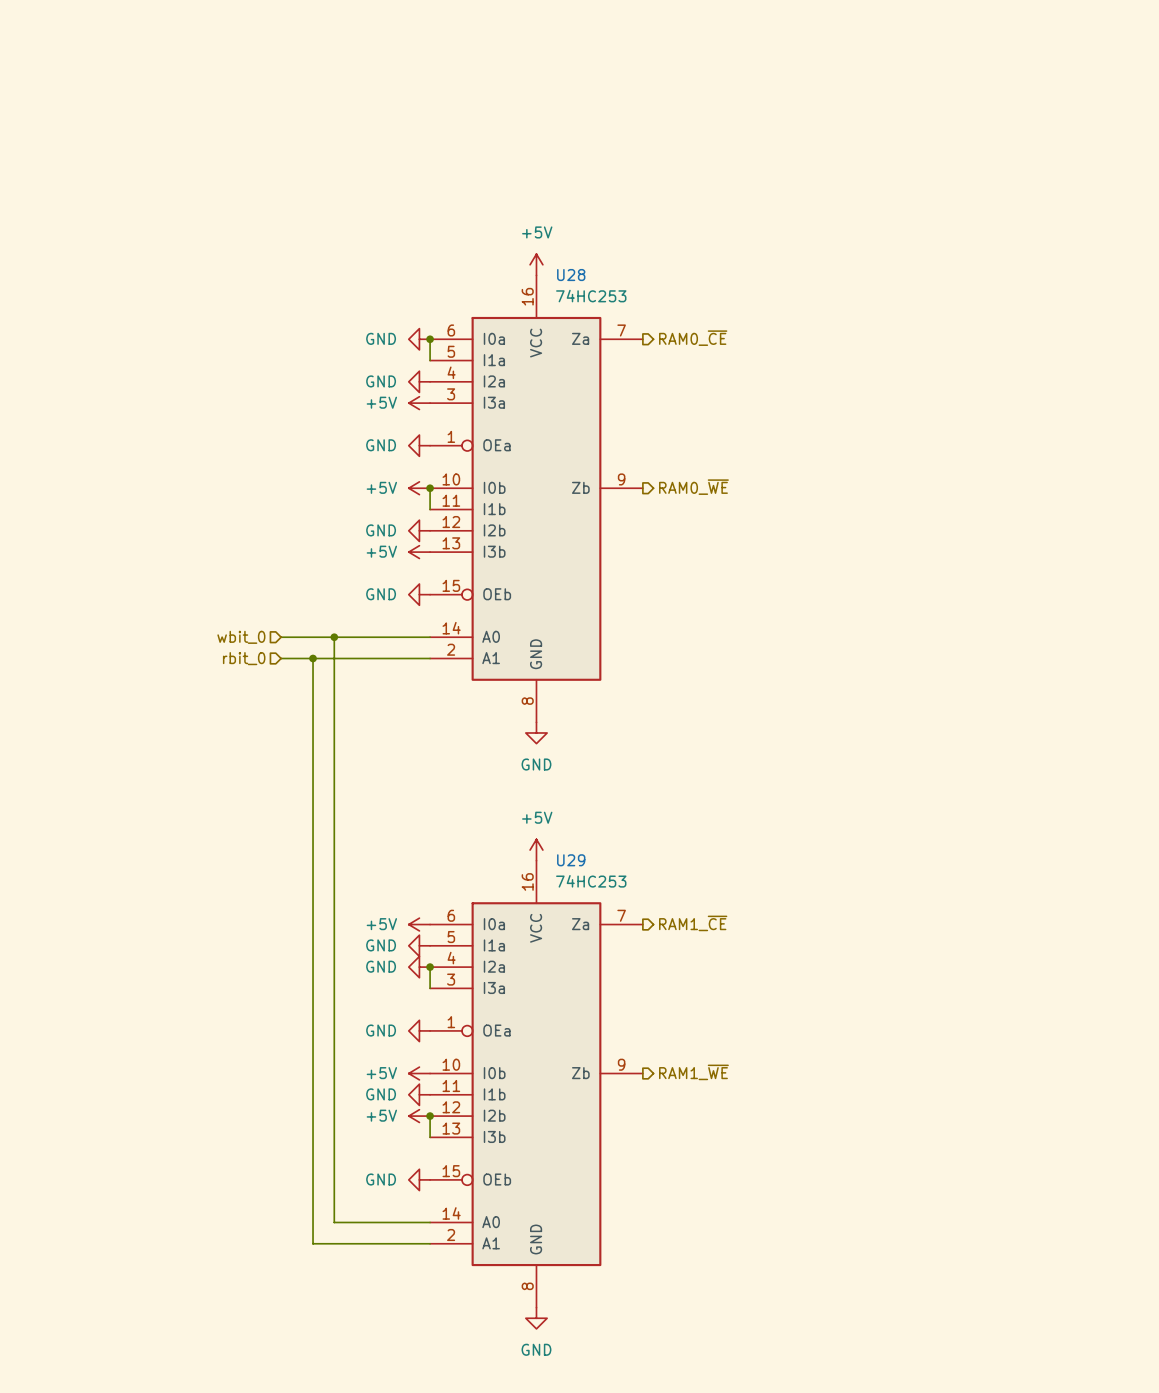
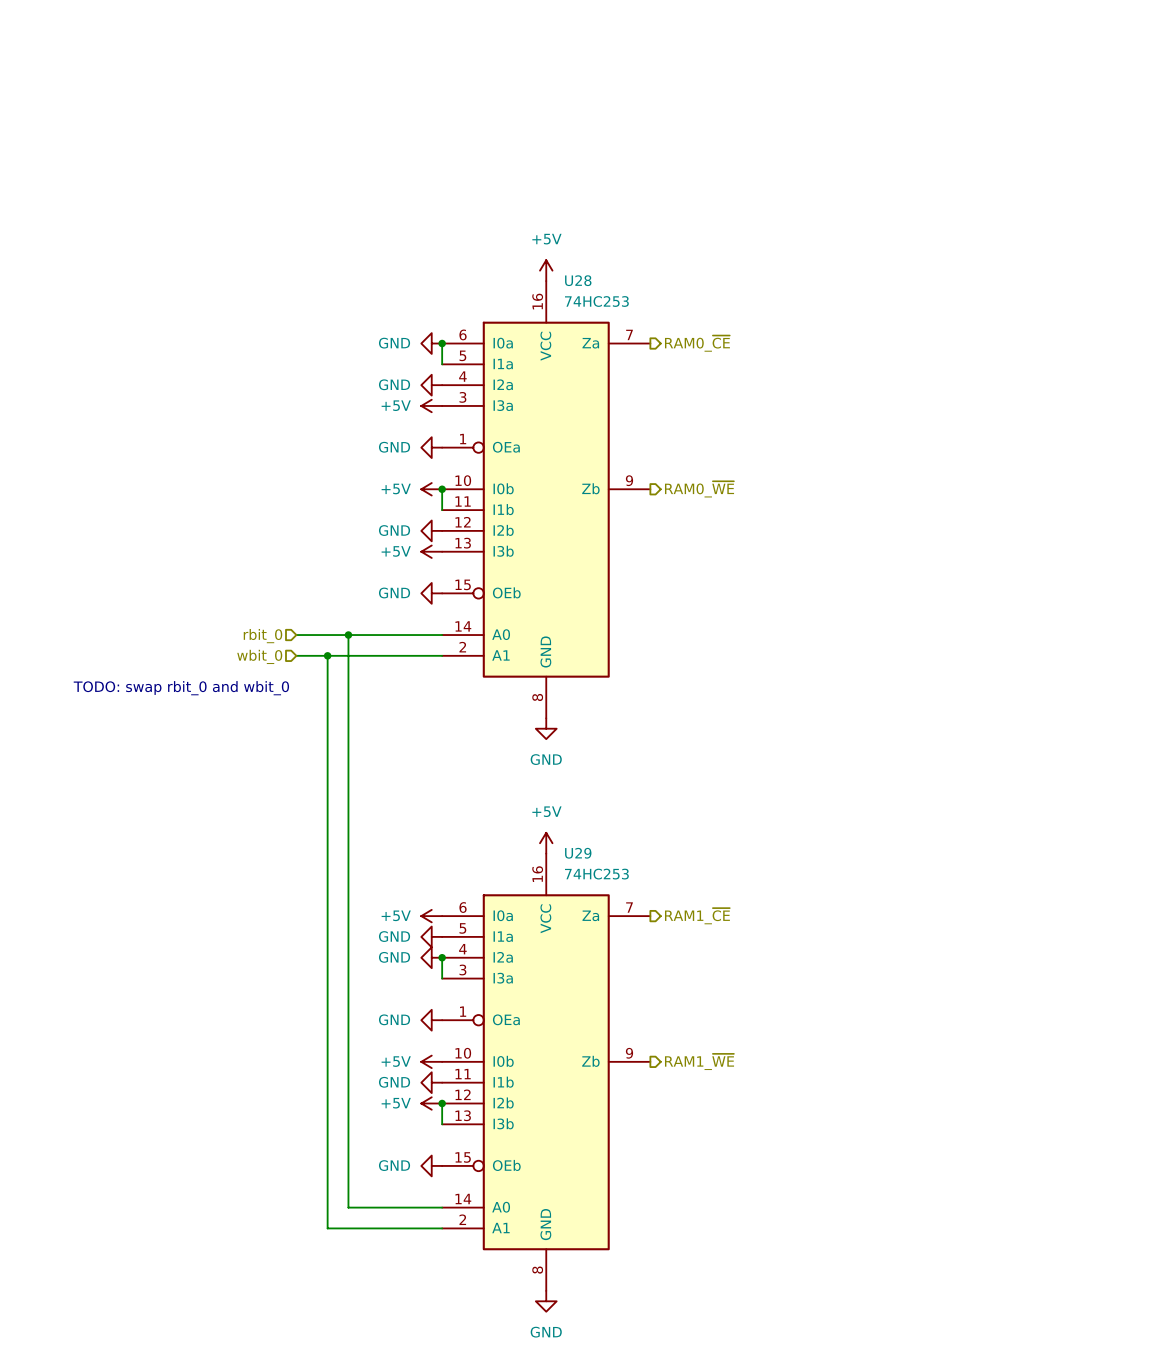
hierarchical label: wbit_0 (241, 637) -> rbit_0 (262, 636)
hierarchical label: rbit_0 (244, 658) -> wbit_0 (259, 656)
text: none -> TODO: swap rbit_0 and wbit_0 (181, 688)

